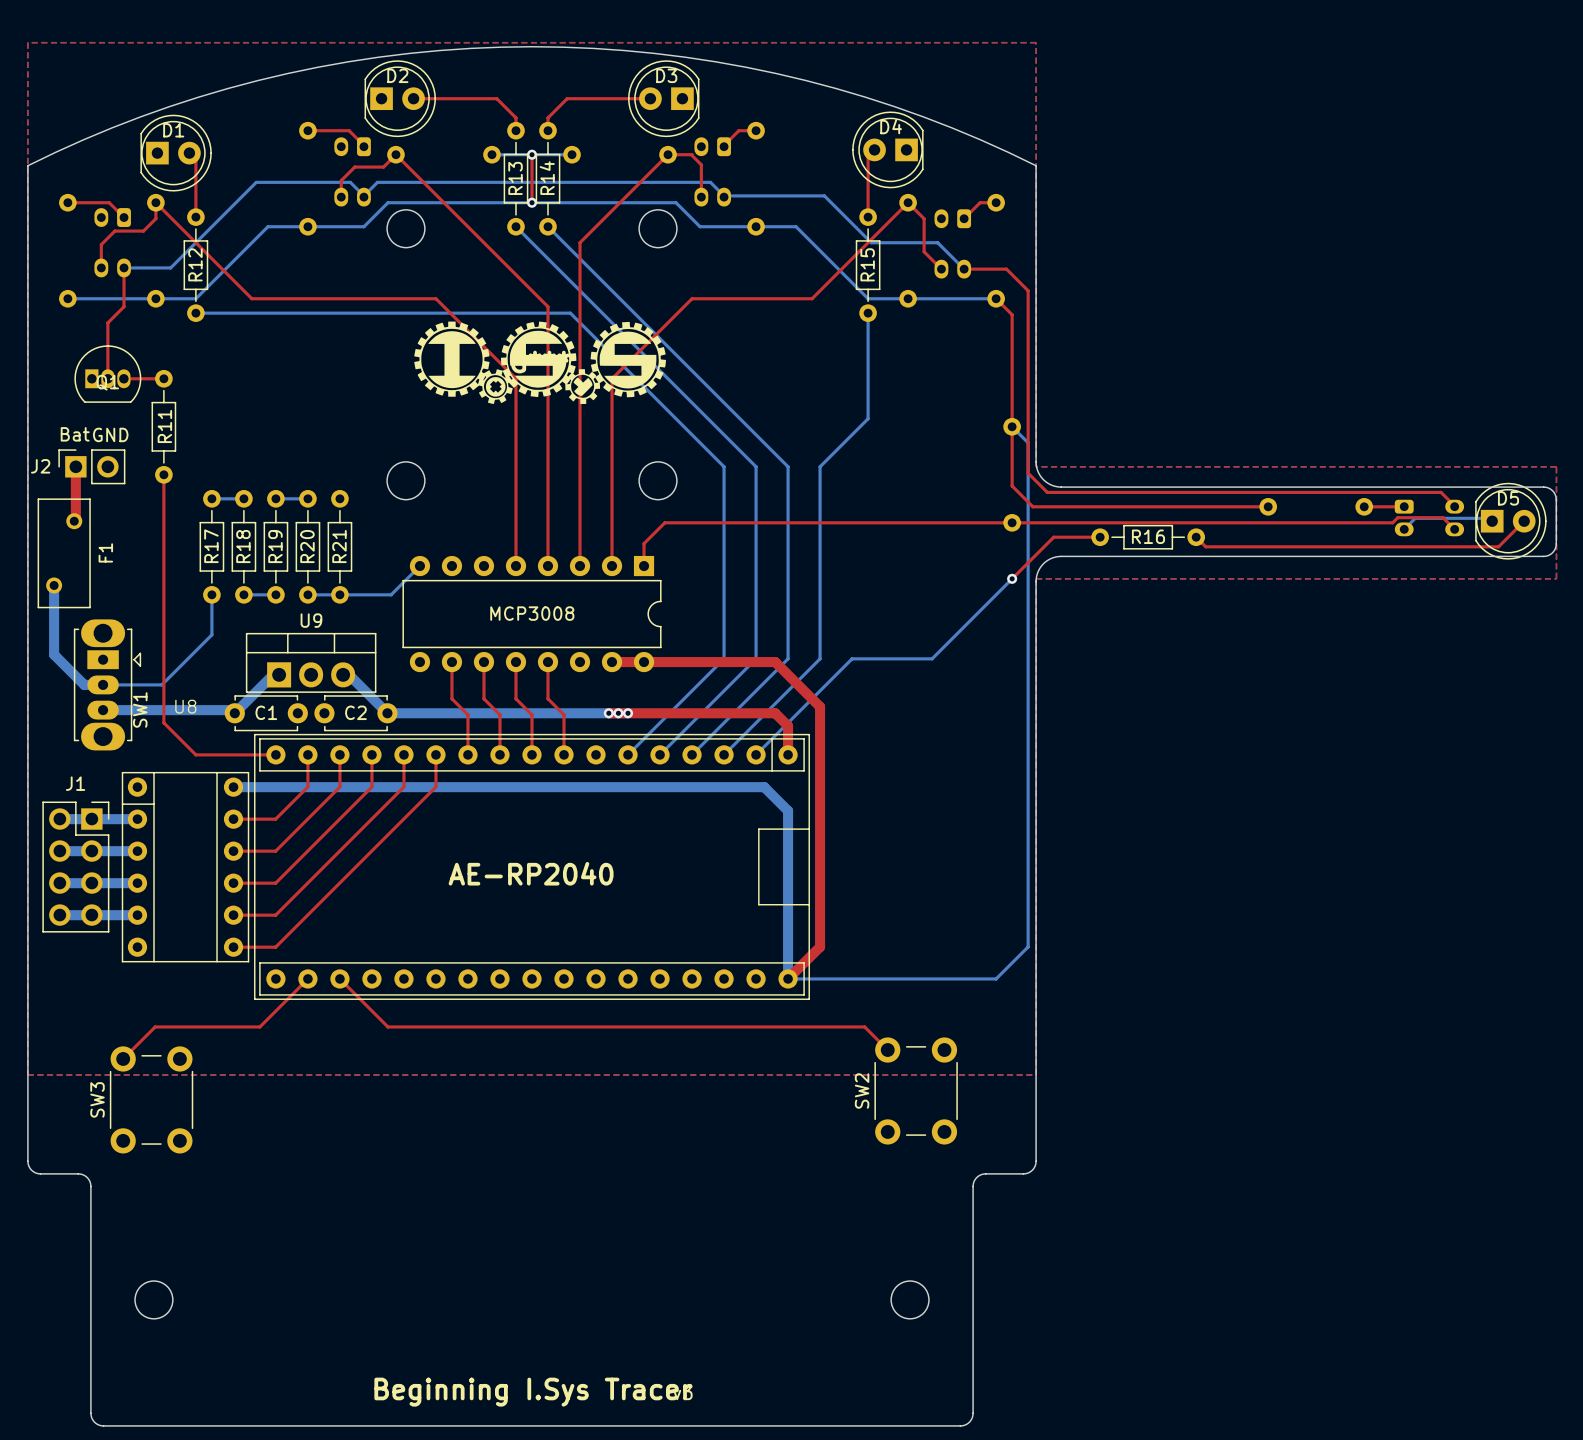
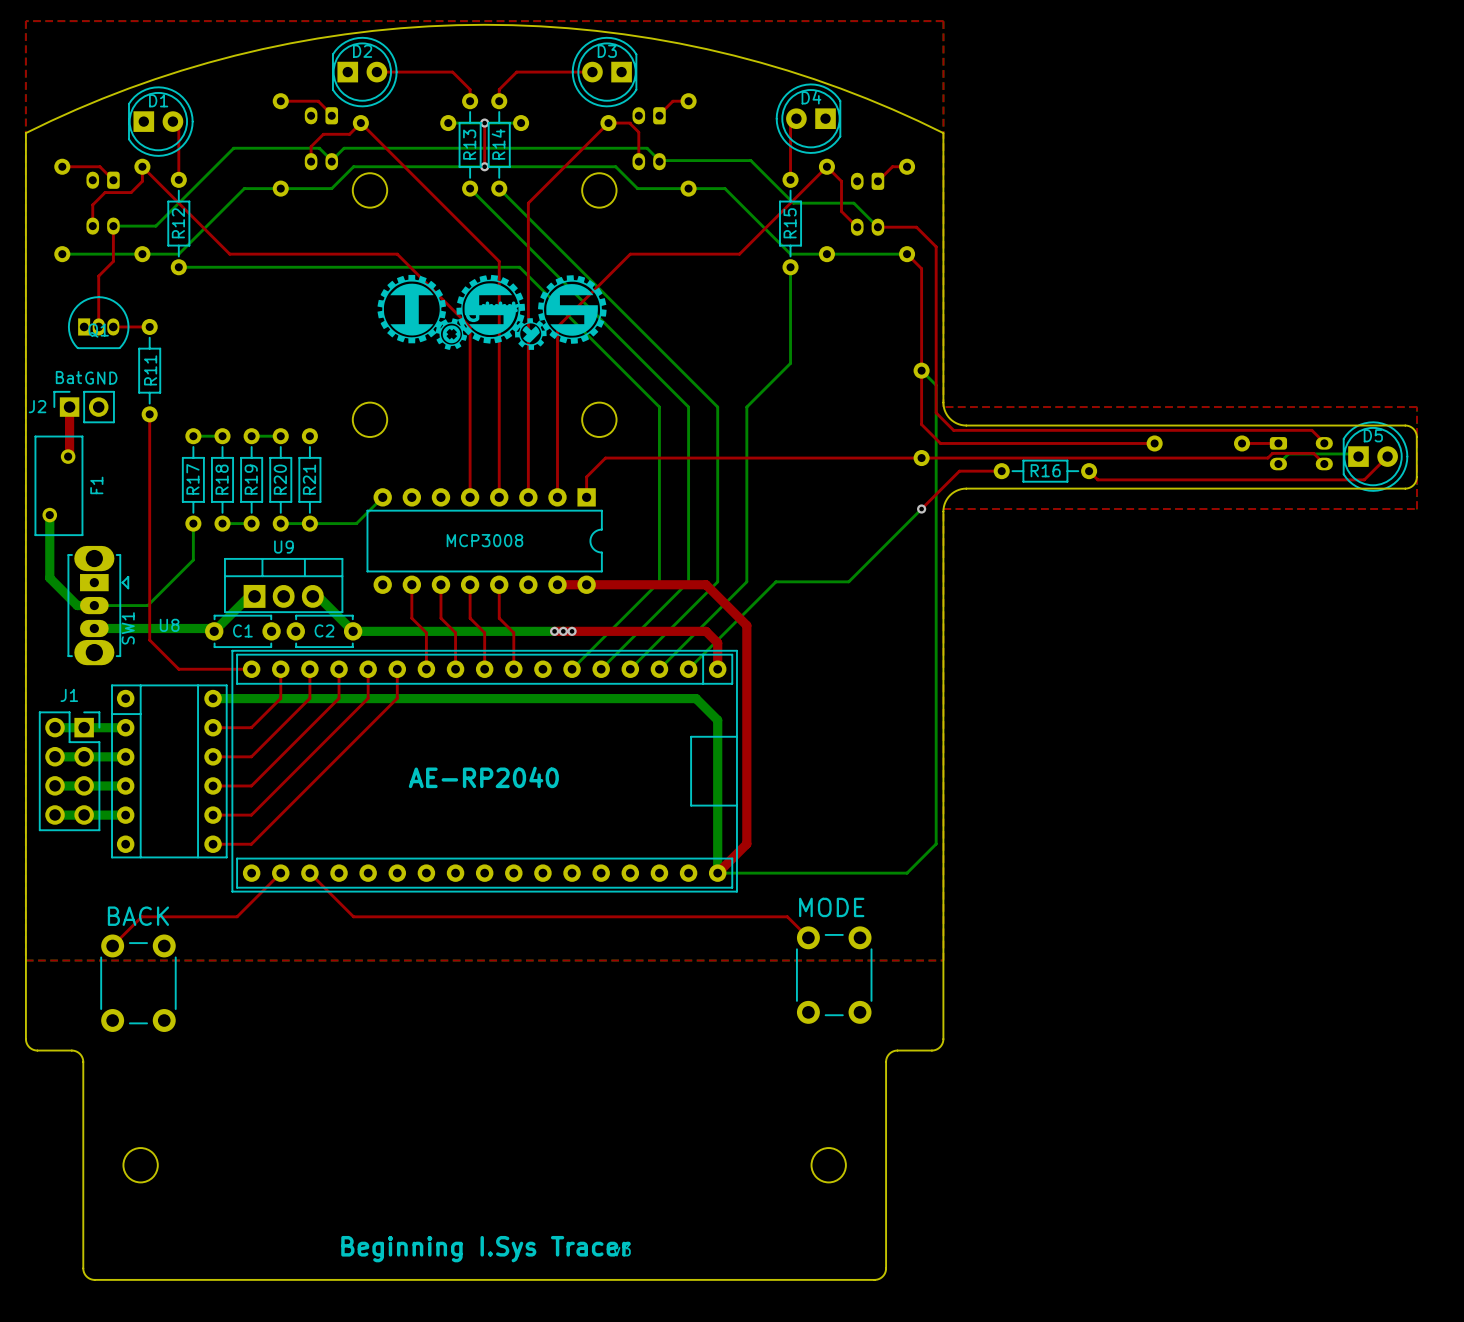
text: none -> MODE (831, 907)
text: none -> BACK (138, 916)
SW2 name: SW2 (862, 1090) -> none
SW3 name: SW3 (97, 1099) -> none

